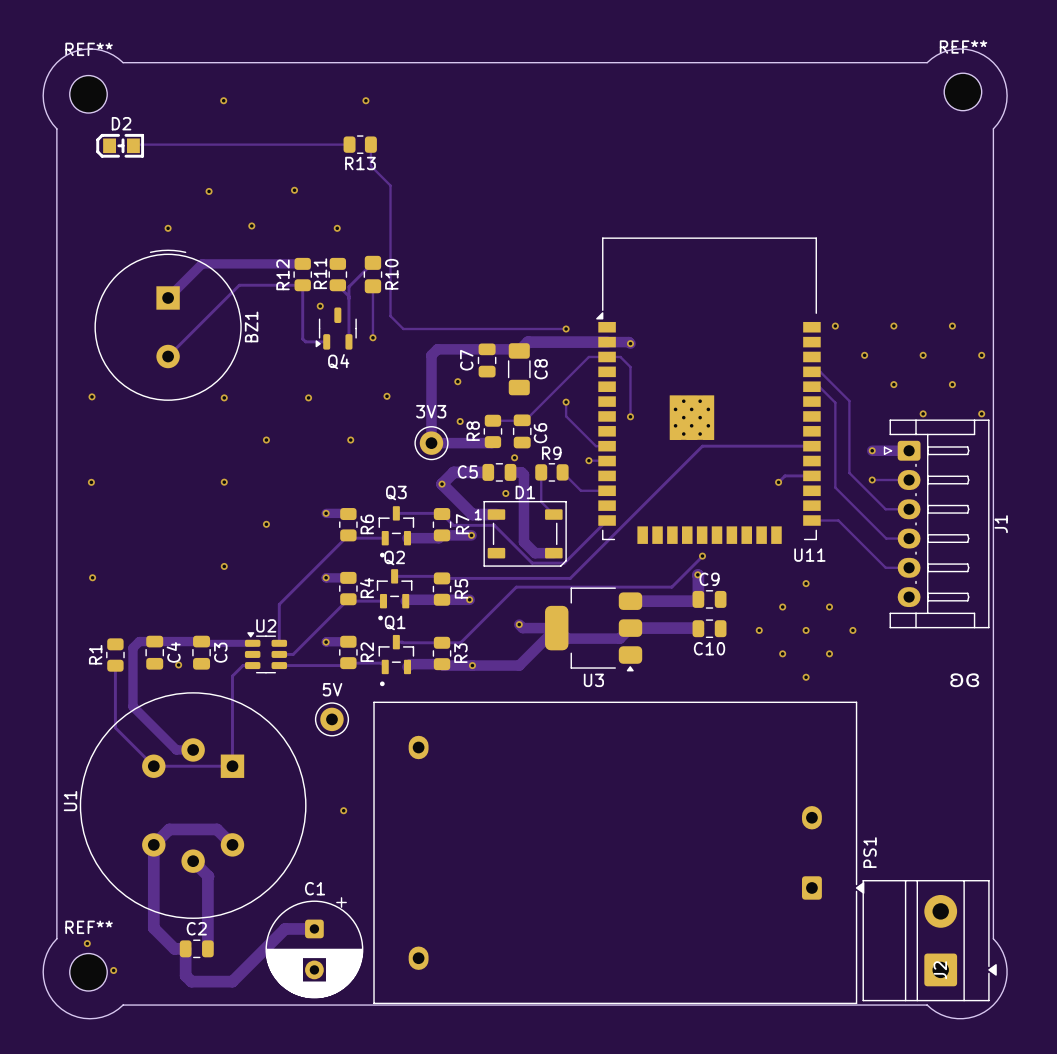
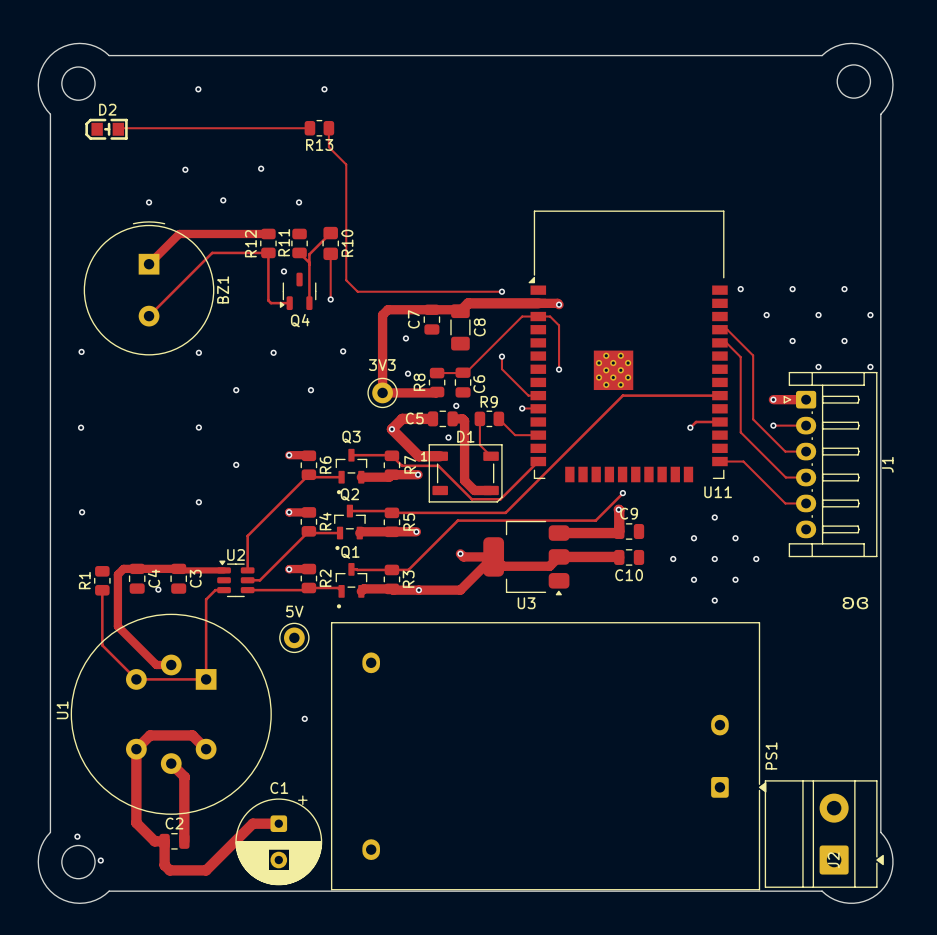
REF** name: REF** (963, 47) -> none
REF** name: REF** (89, 49) -> none
REF** name: REF** (89, 927) -> none

